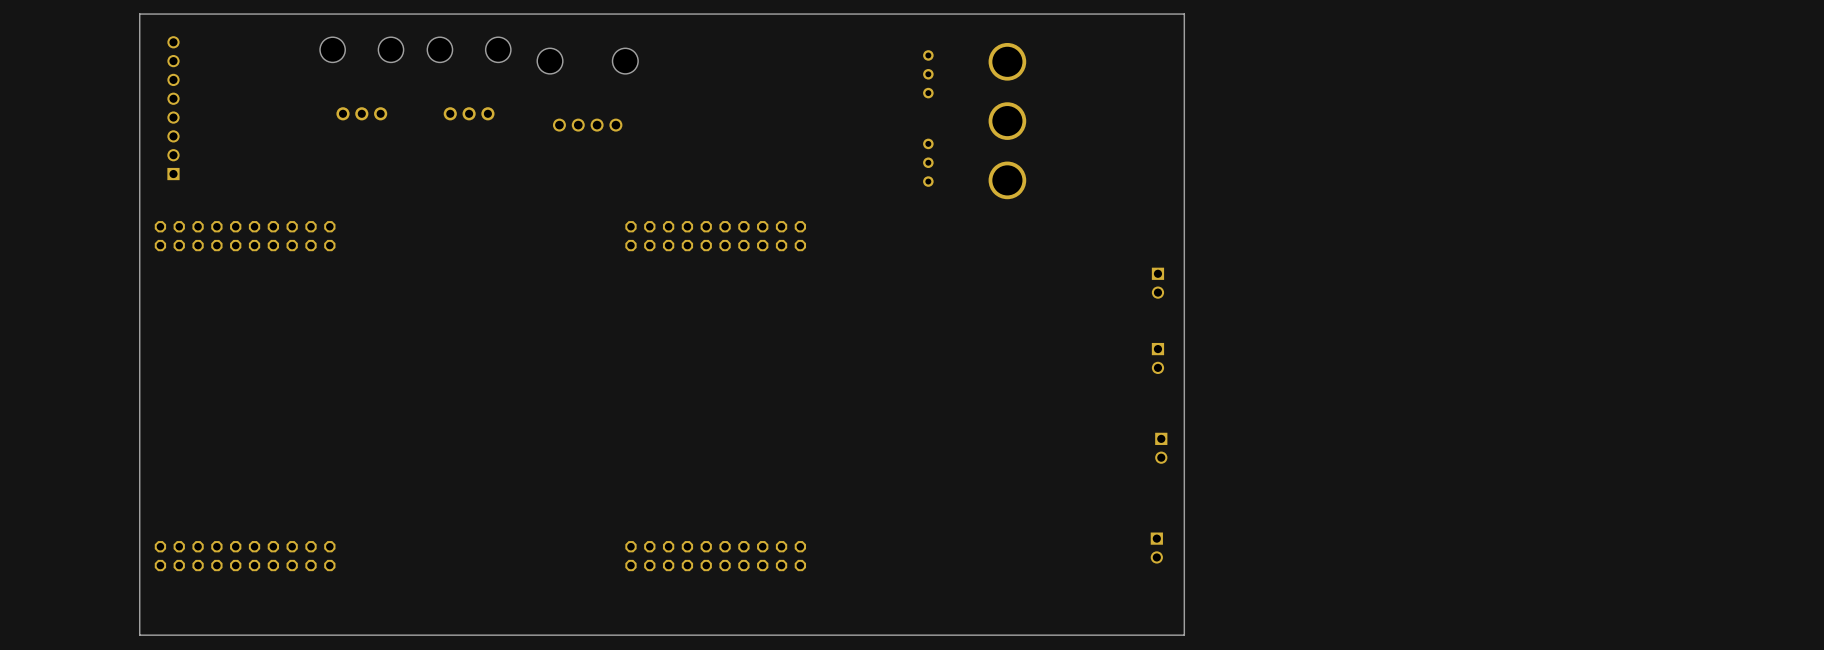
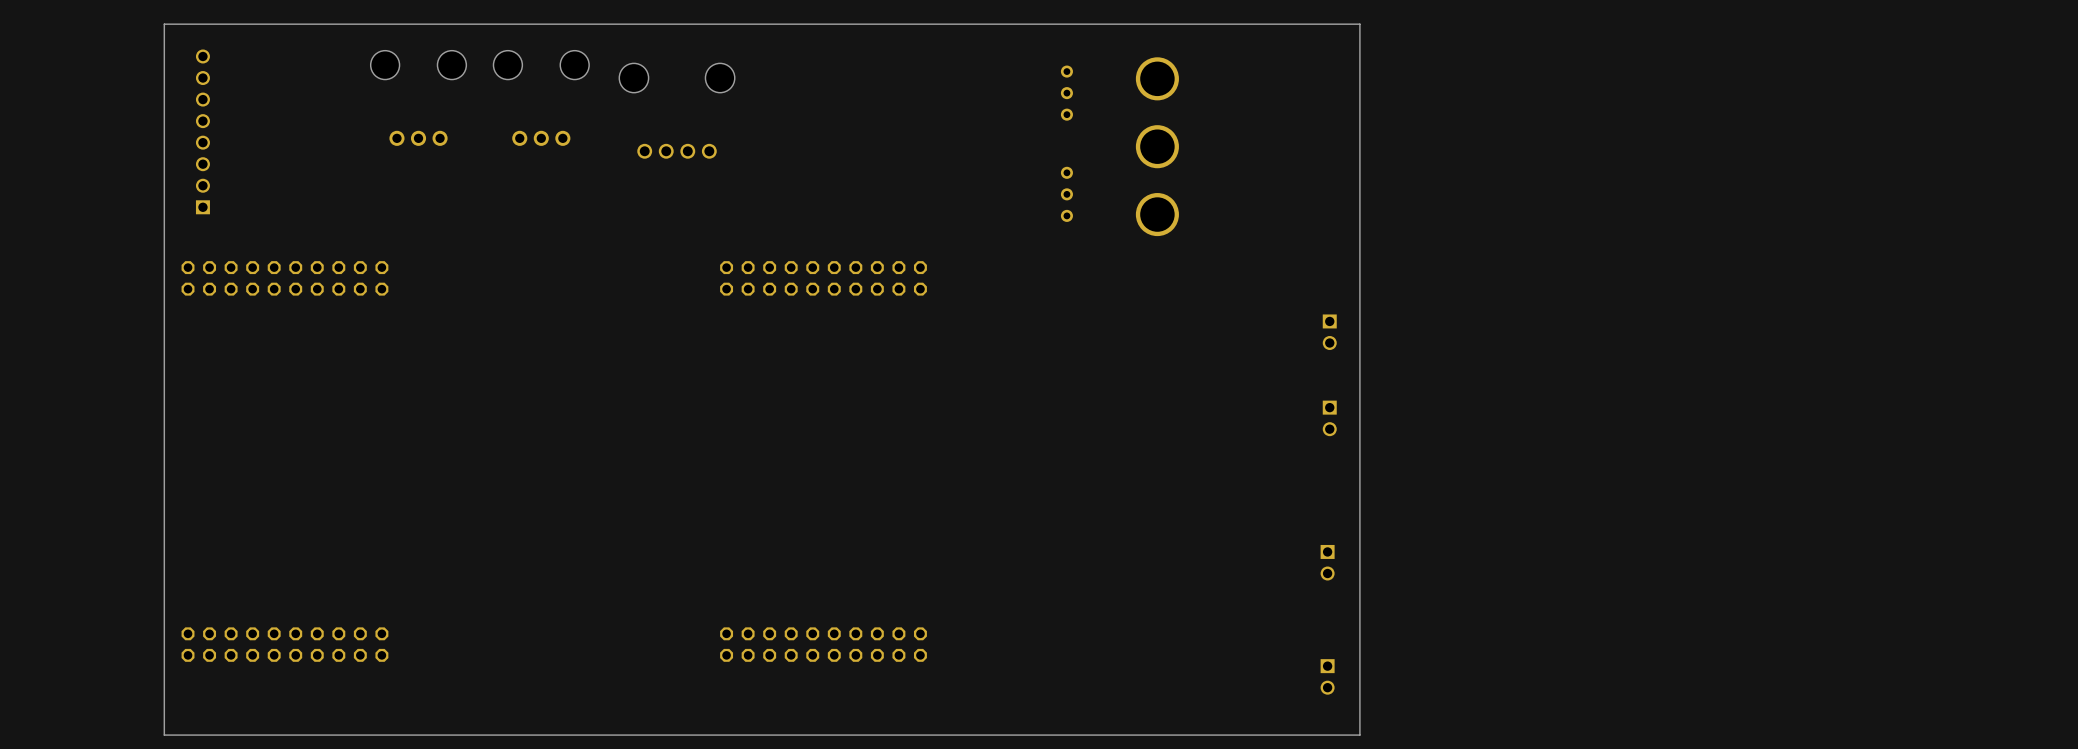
part: (1161, 448) -> none
part: none -> (1327, 562)
part: (1156, 548) -> none
part: none -> (1327, 676)

